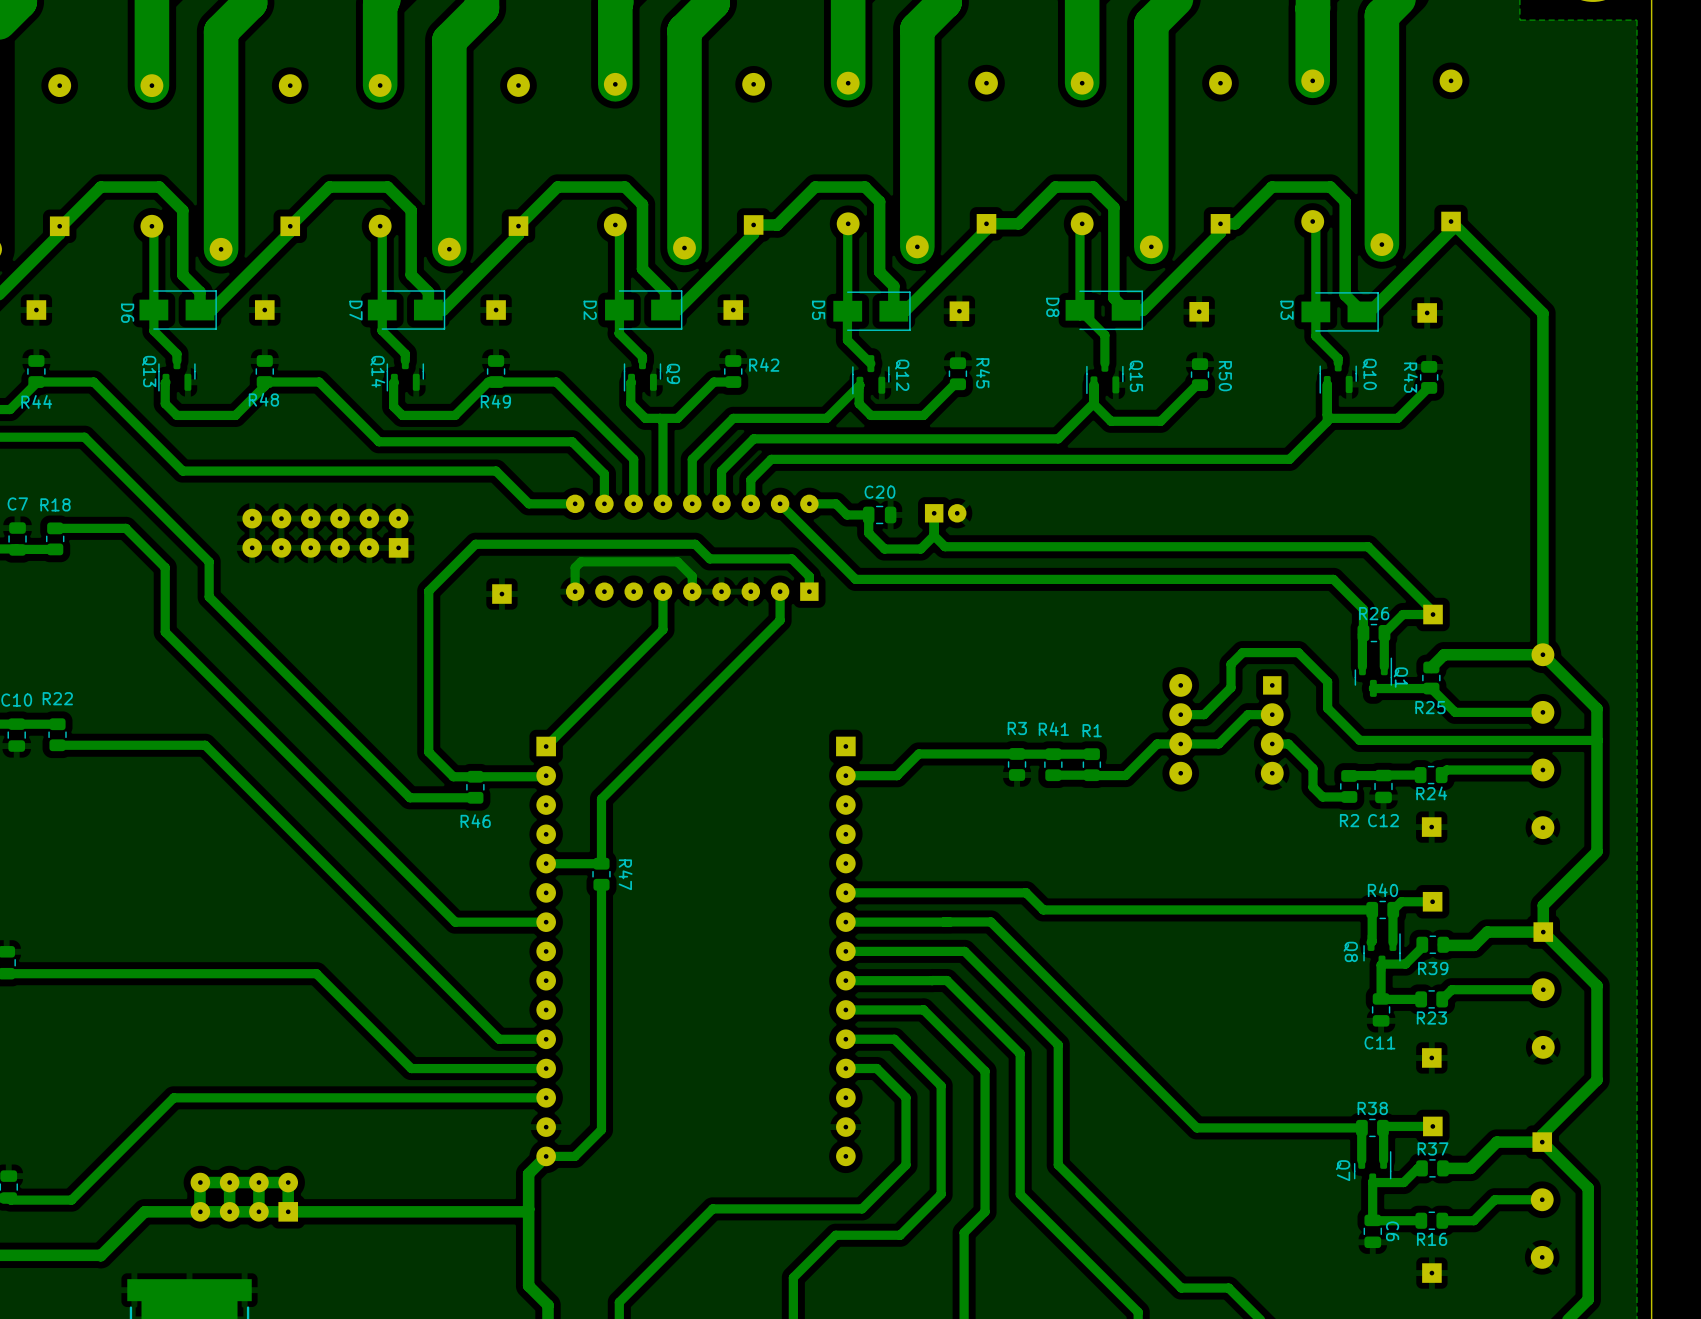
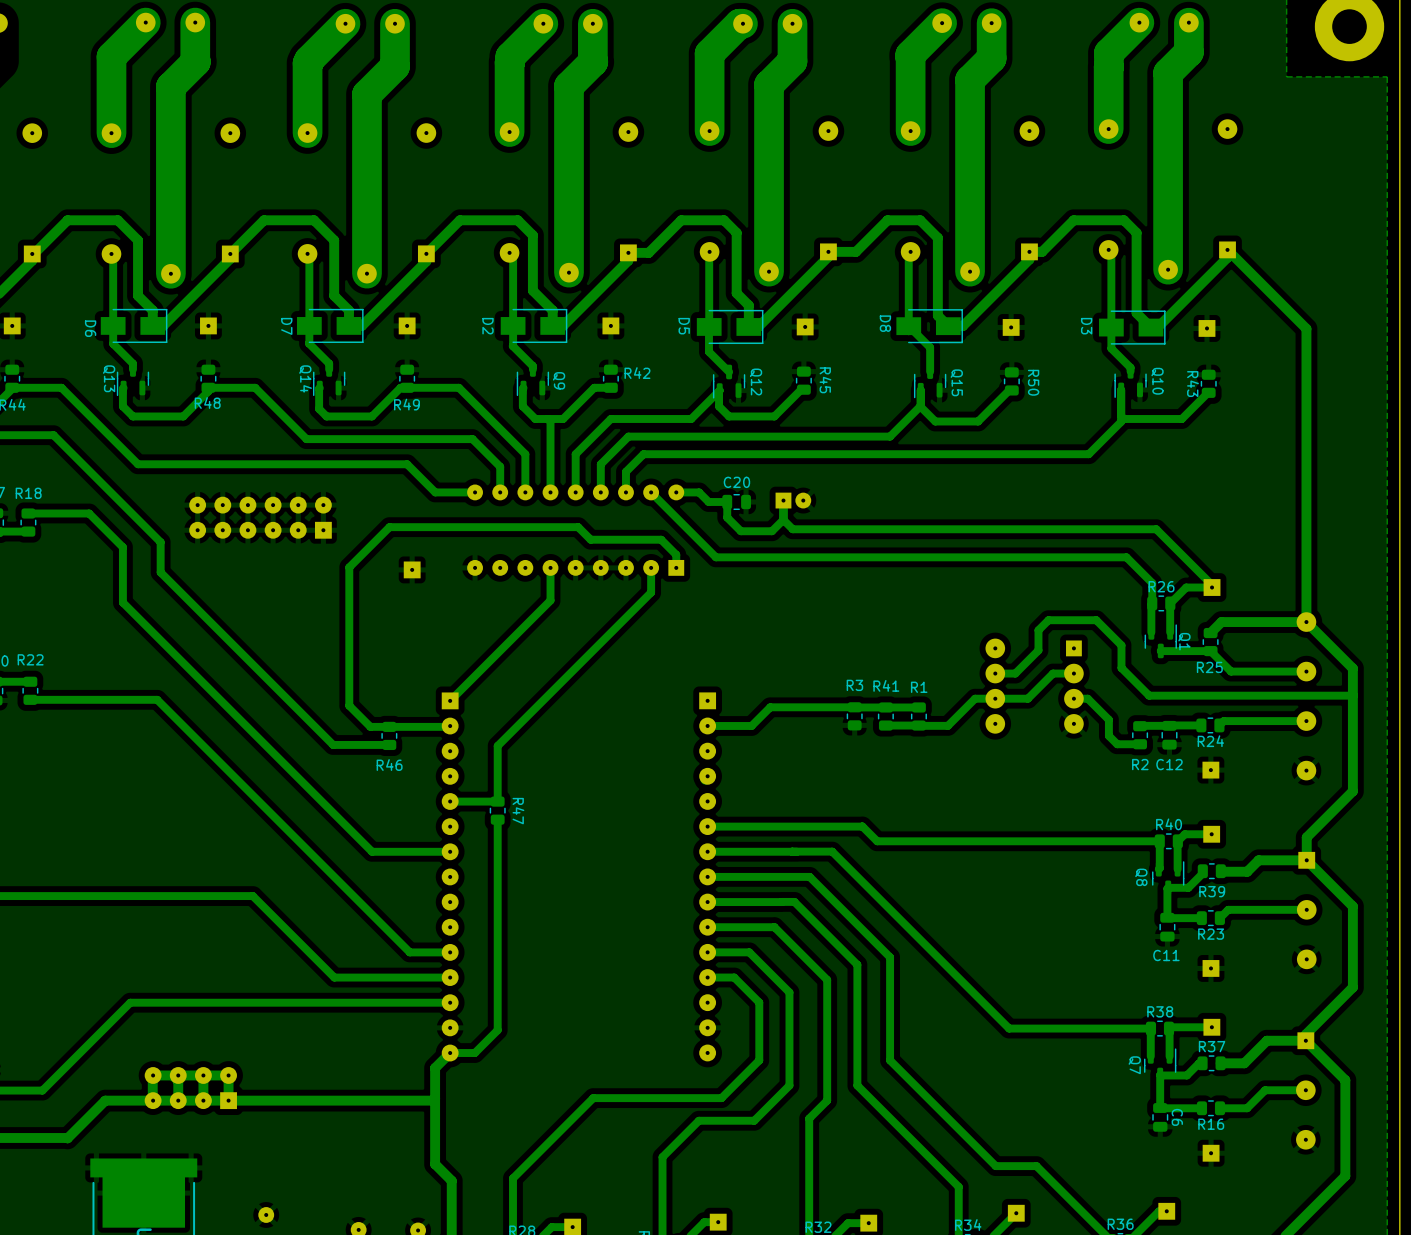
bottom track: (692, 591) (692, 576) (677, 561) (581, 561) (575, 567) (575, 591) -> none

